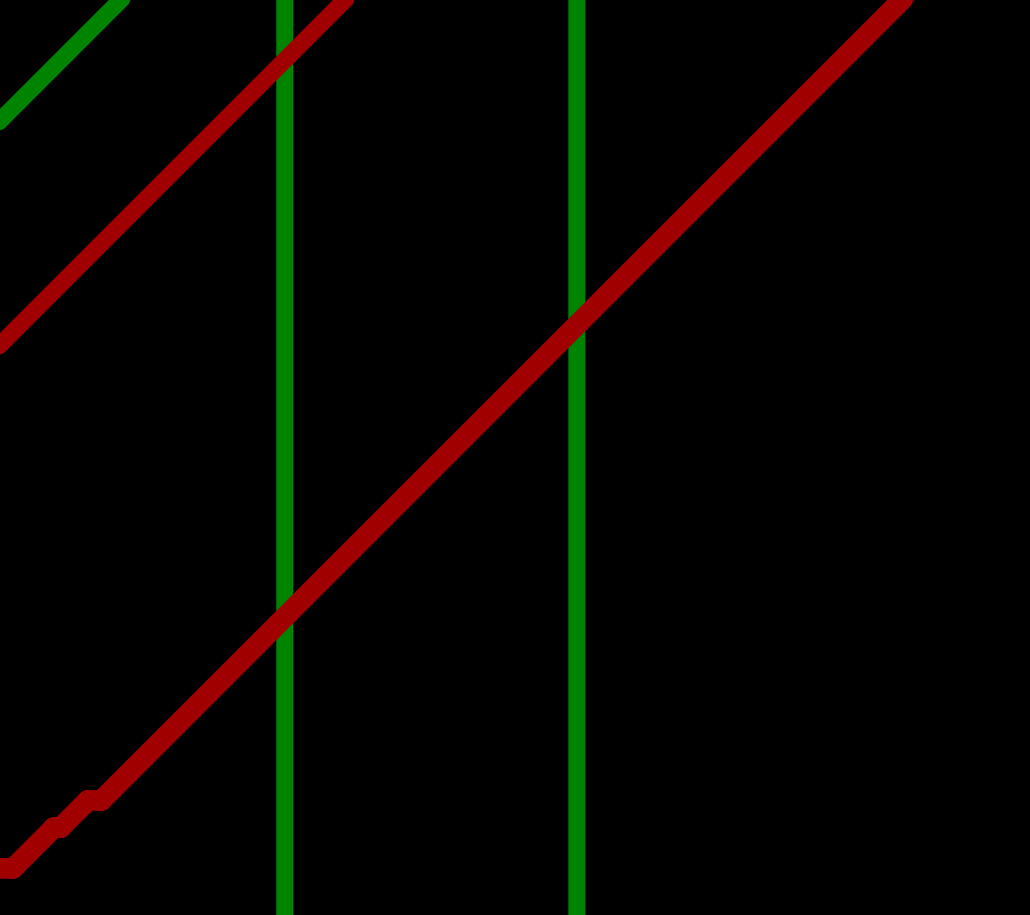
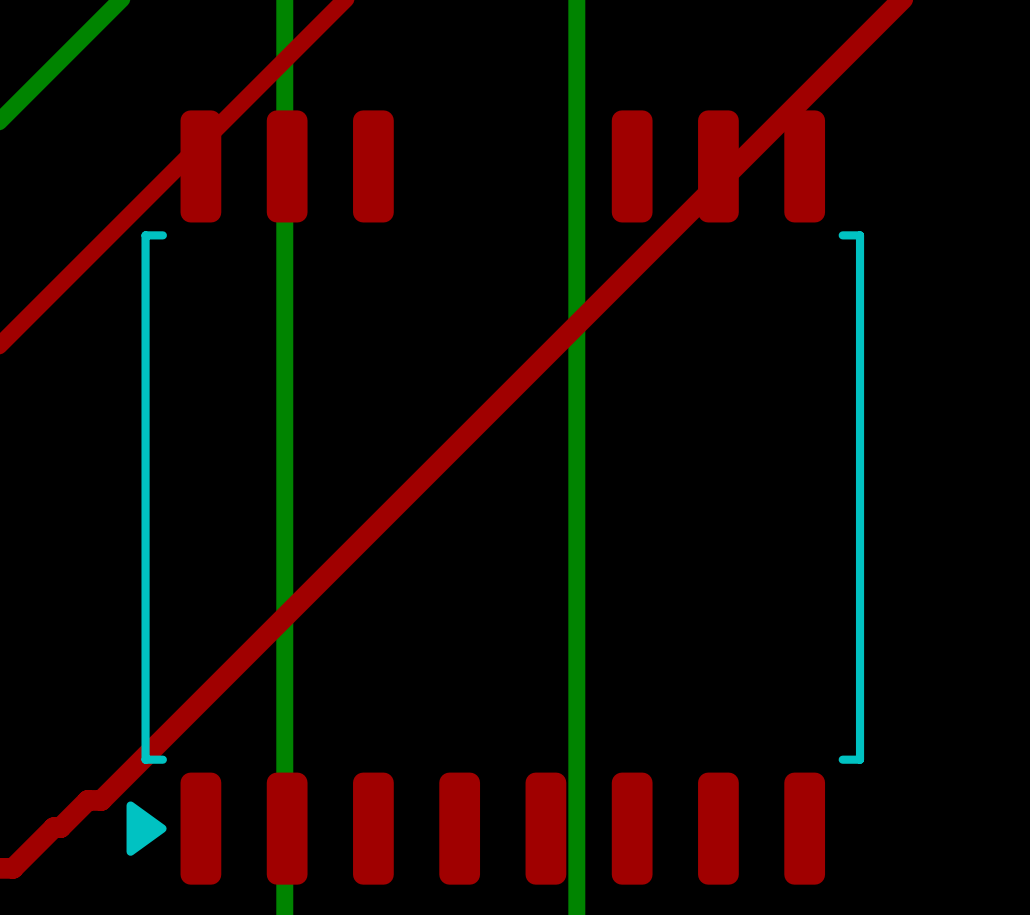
part: none -> (495, 497)

